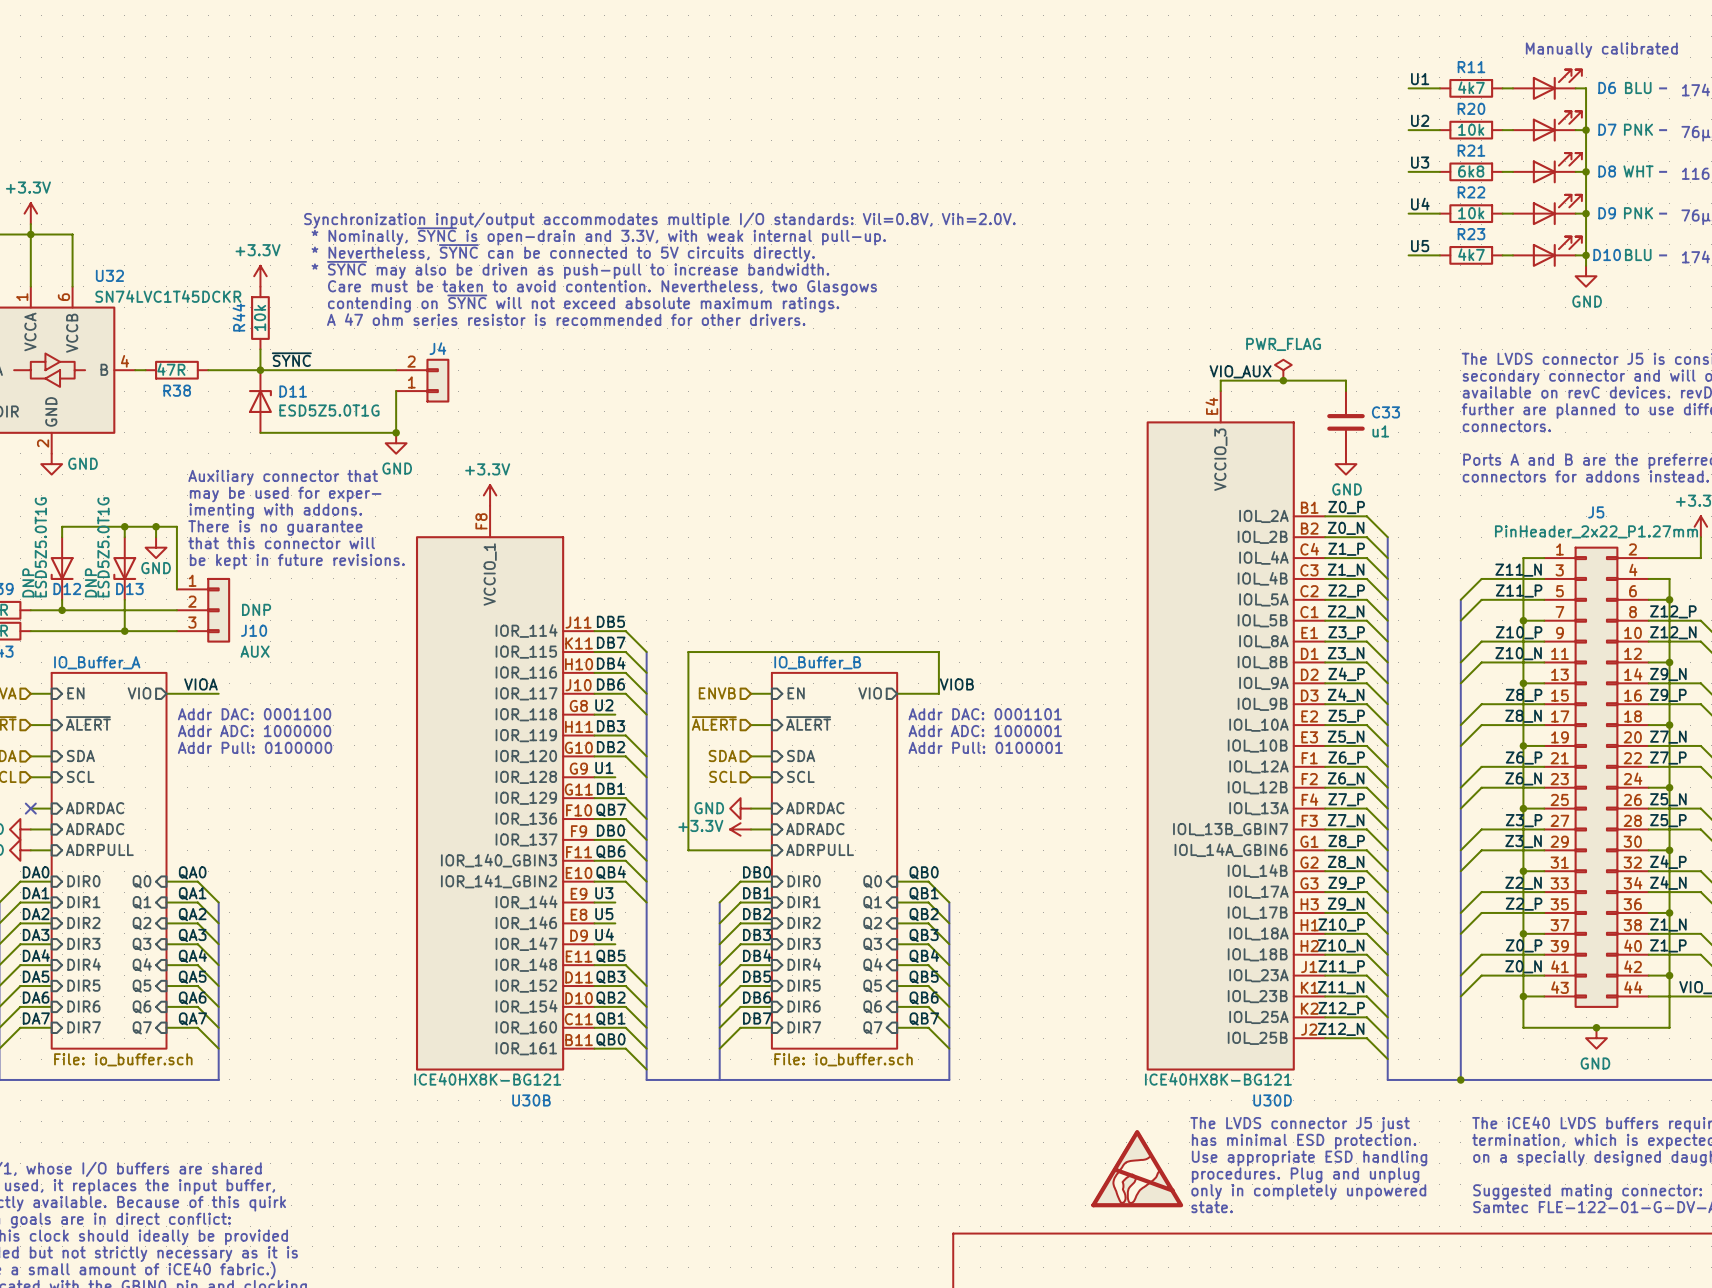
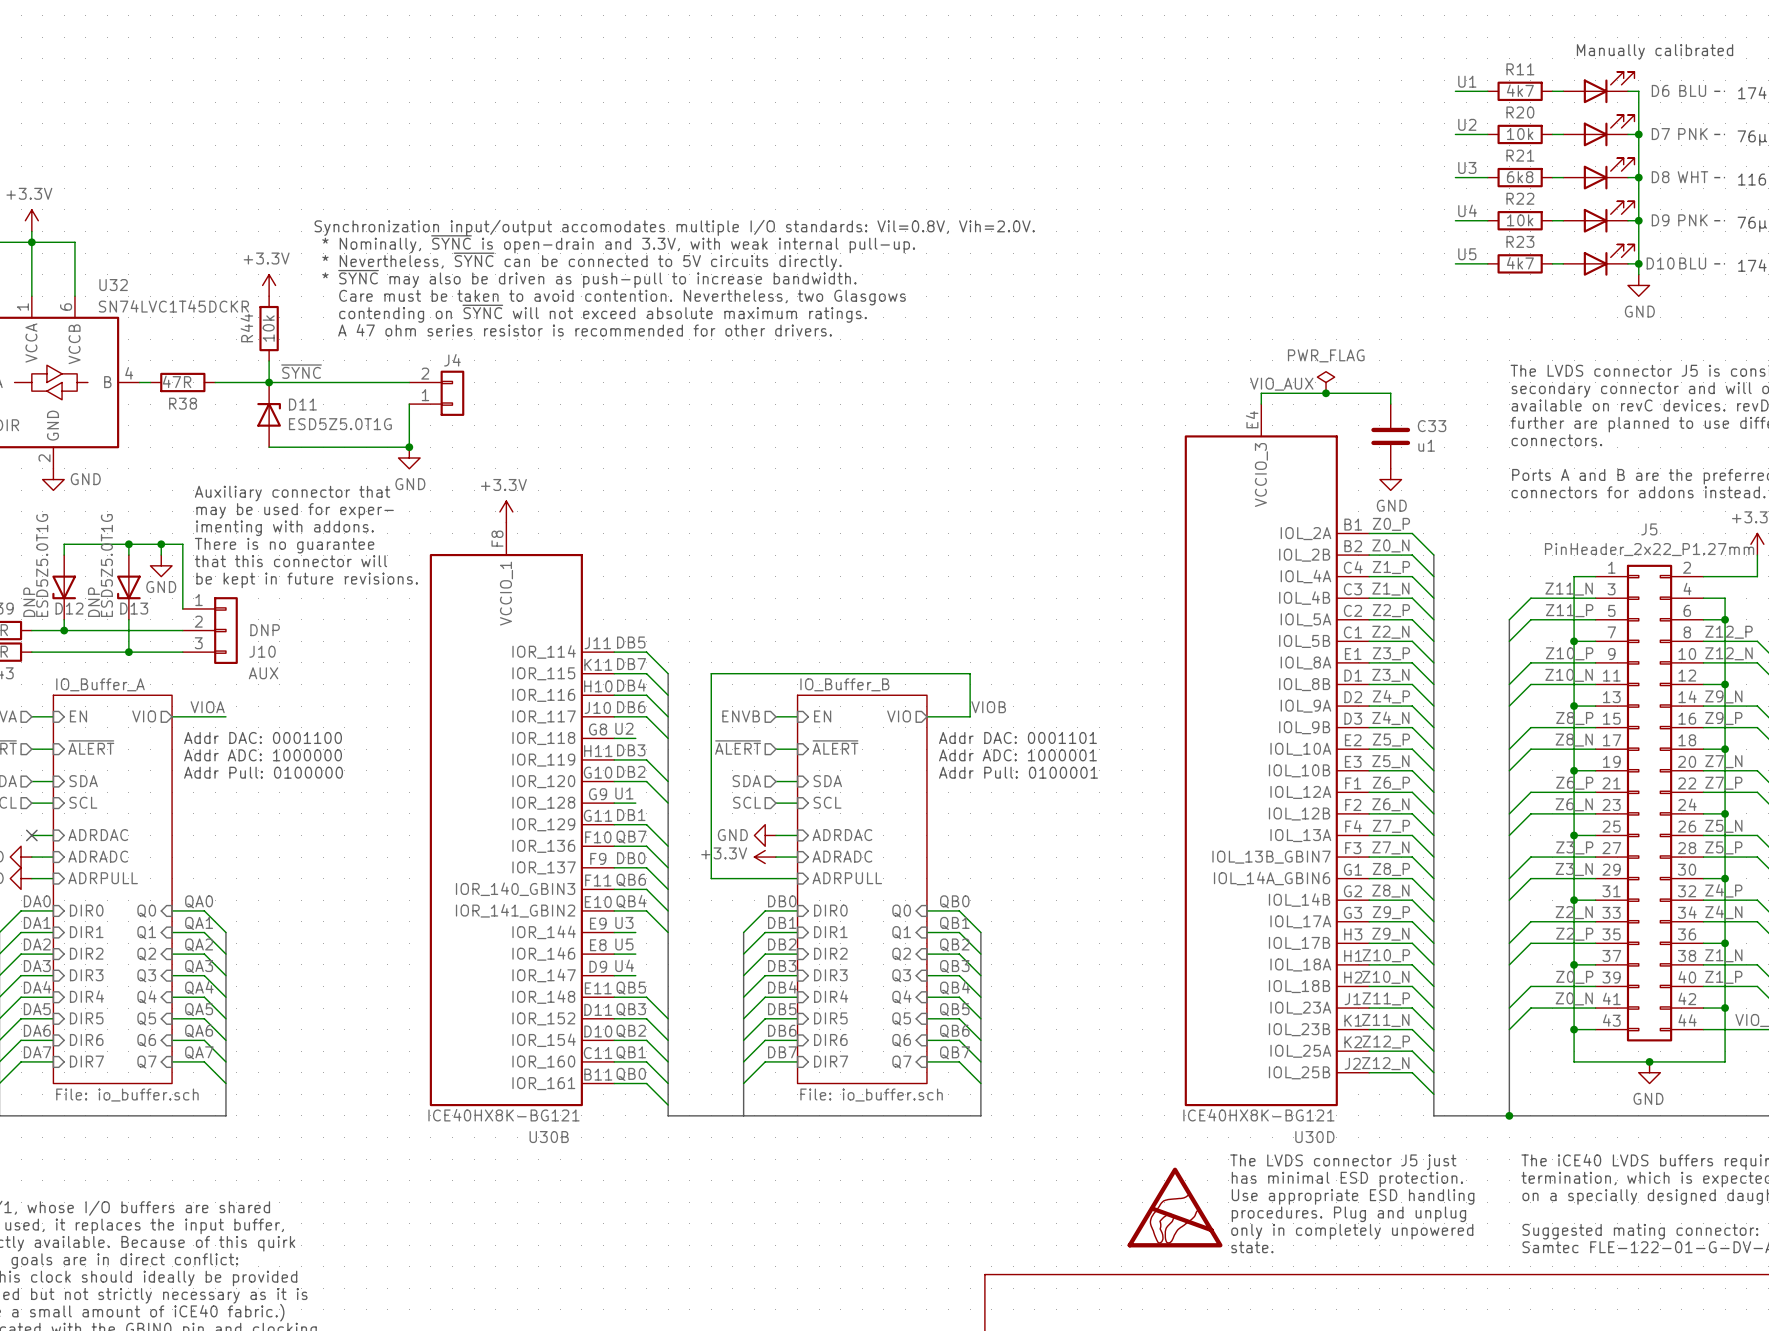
text: Synchronization input/output accommodates multiple I/O standards: Vil=0.8V, Vih=2.0V. (659, 220) -> Synchronization input/output accomodates multiple I/O standards: Vil=0.8V, Vih=2.0V. (674, 227)

